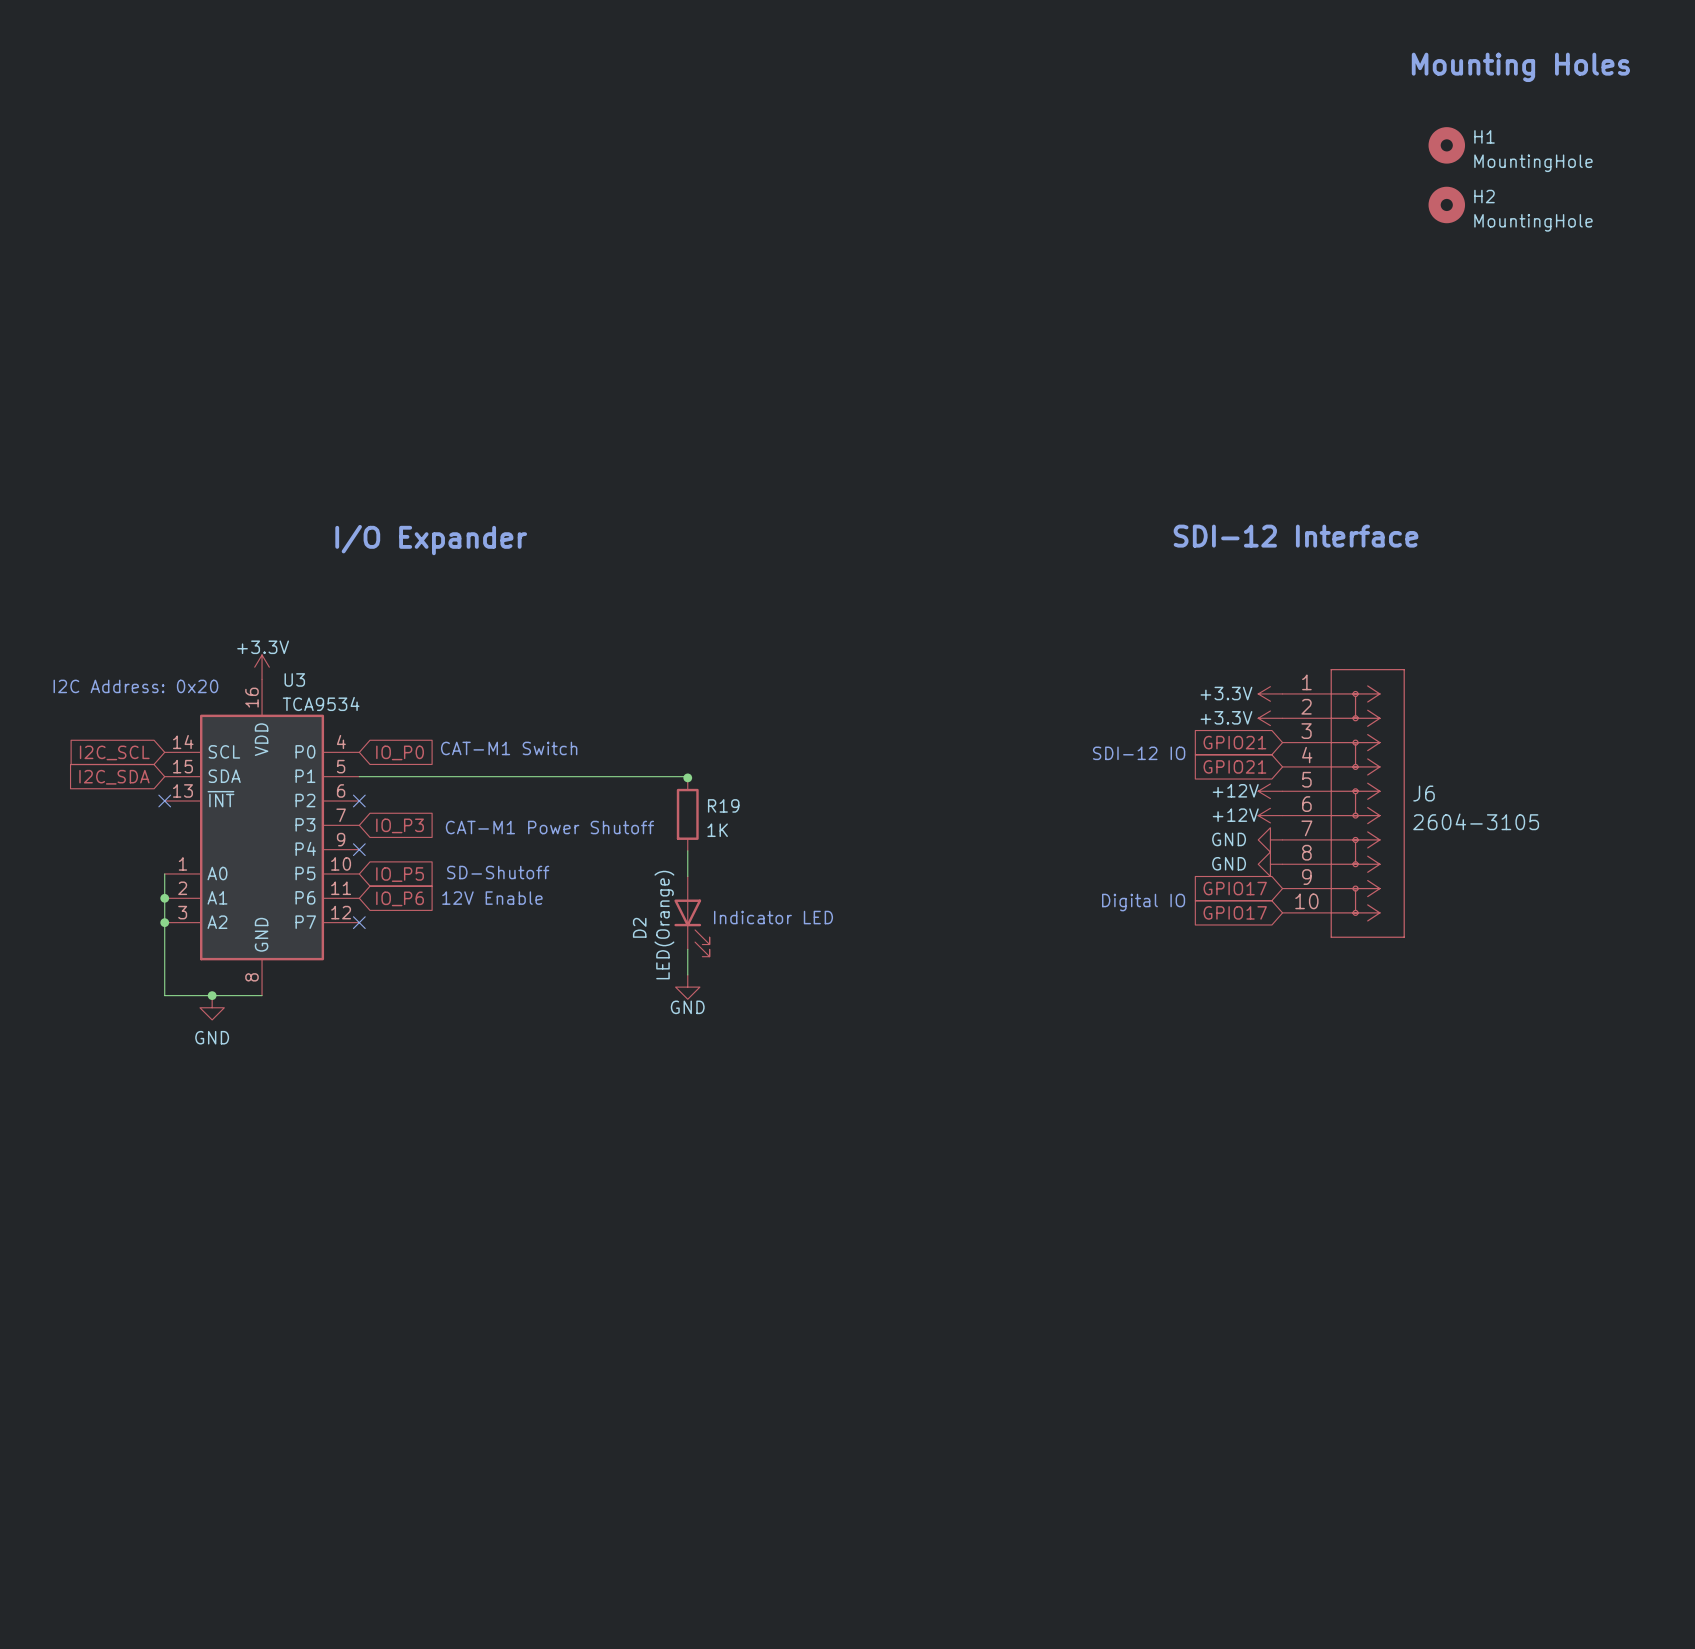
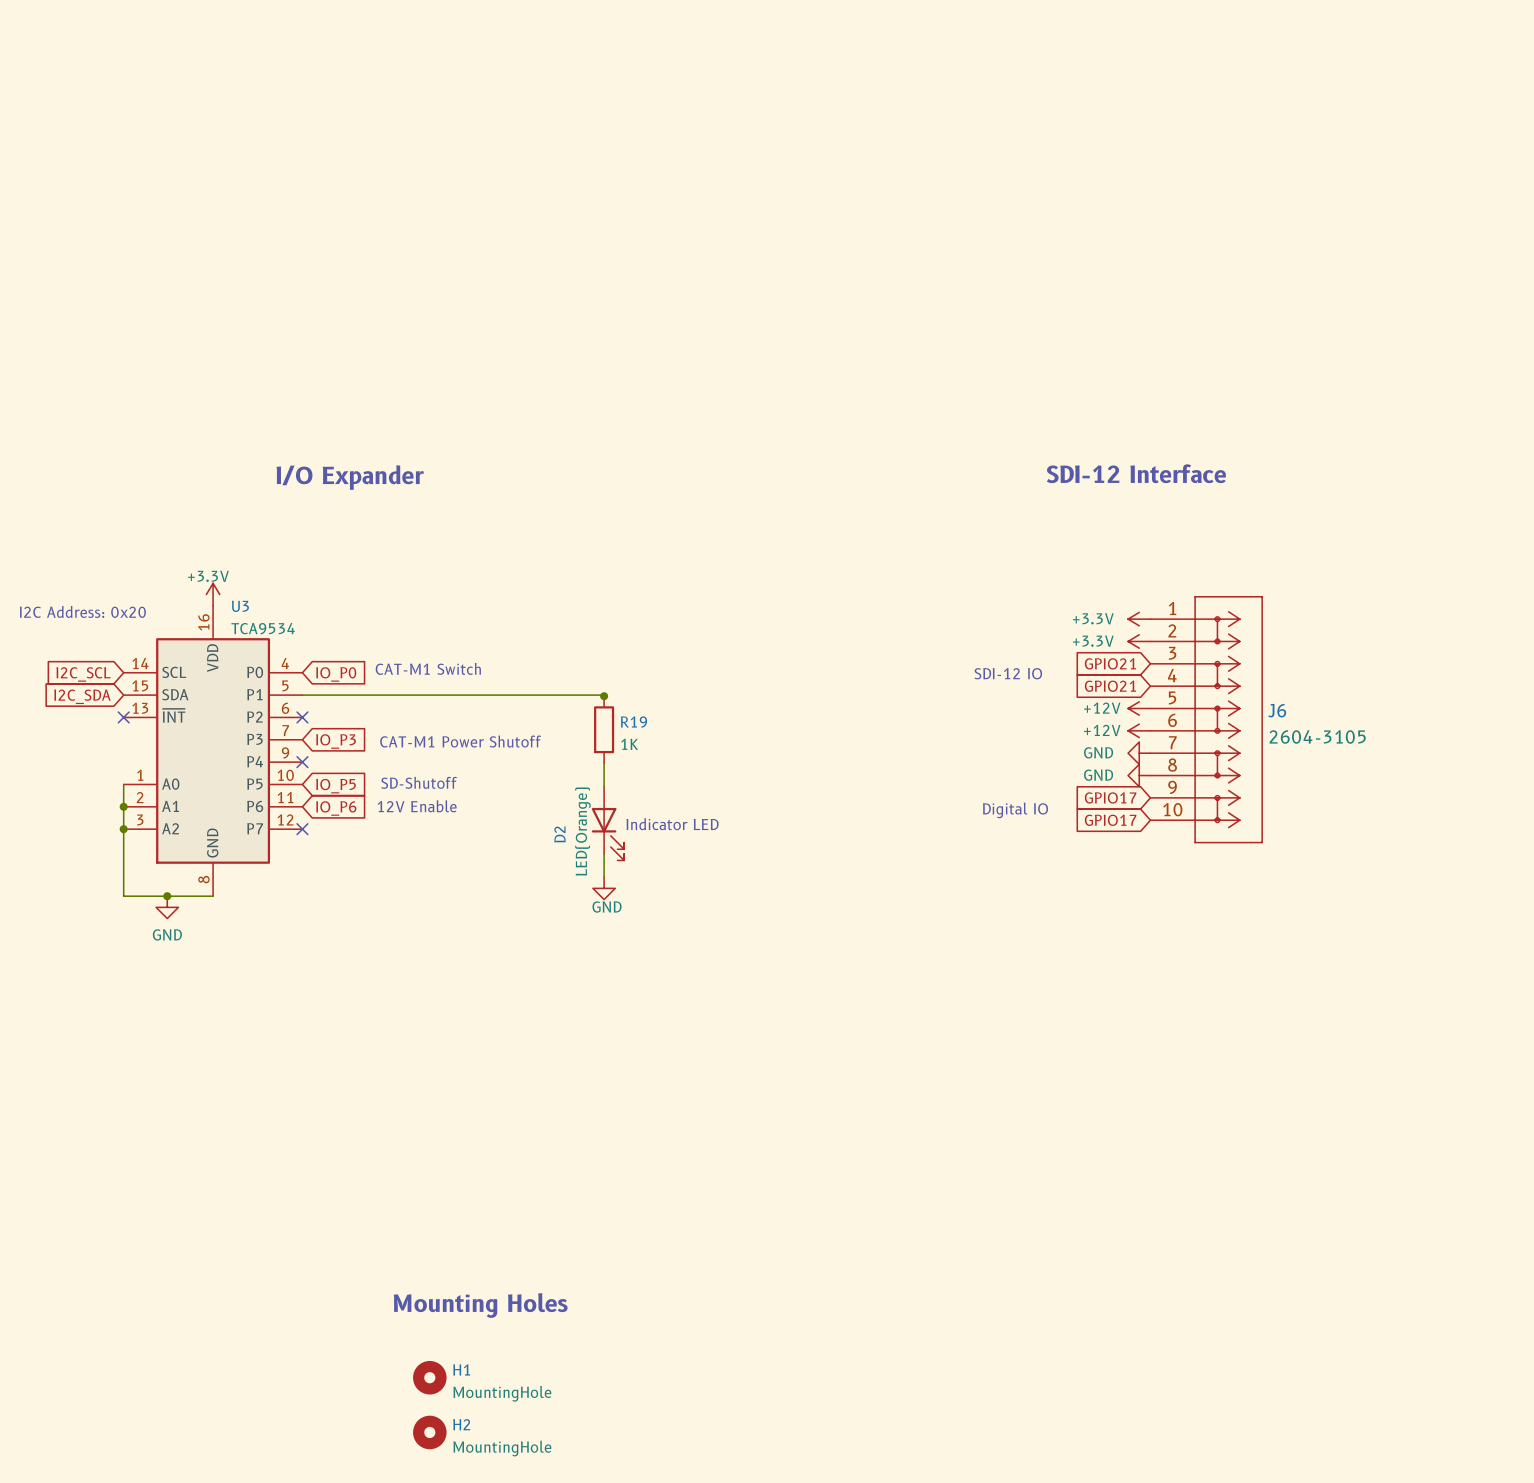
text: Mounting Holes (1520, 67) -> none
H1 position: (1446, 145) -> (429, 1377)
H2 position: (1446, 204) -> (429, 1432)
text: none -> Mounting Holes (480, 1305)

